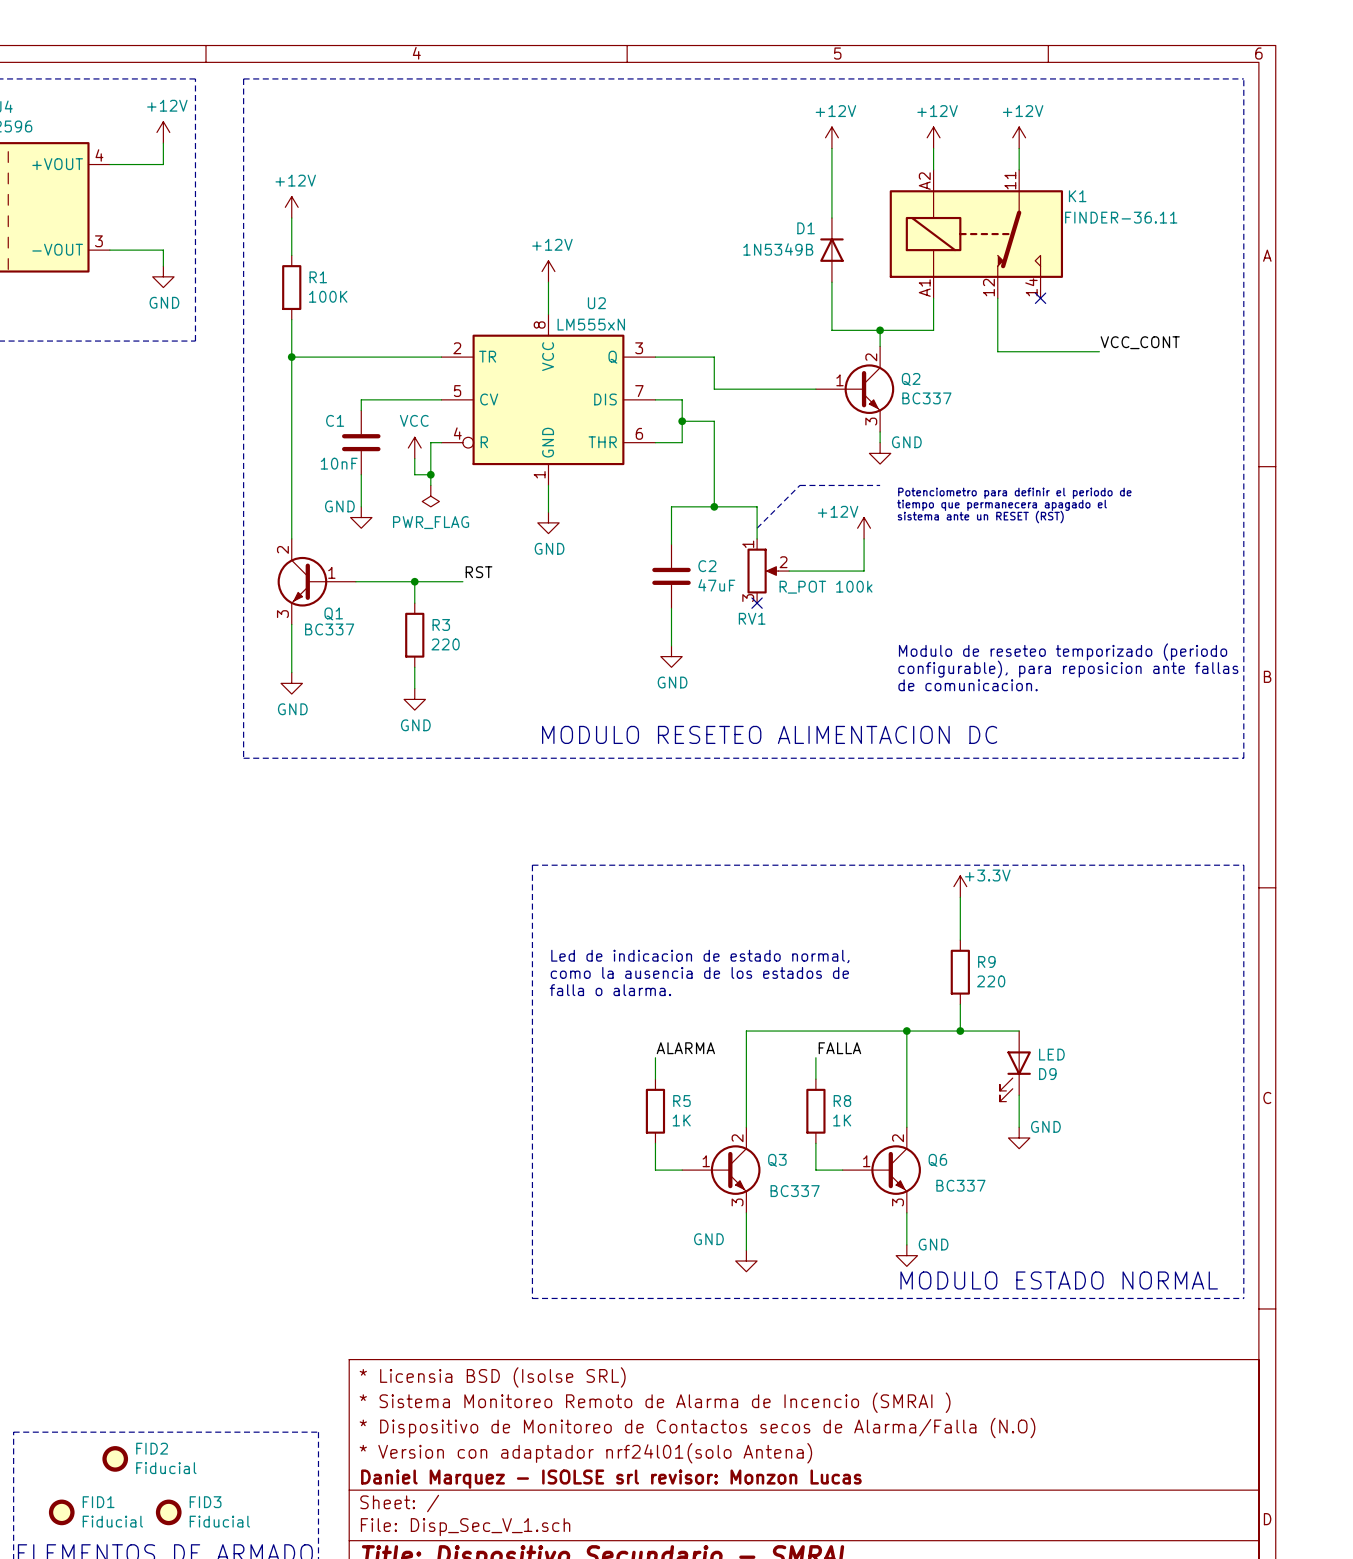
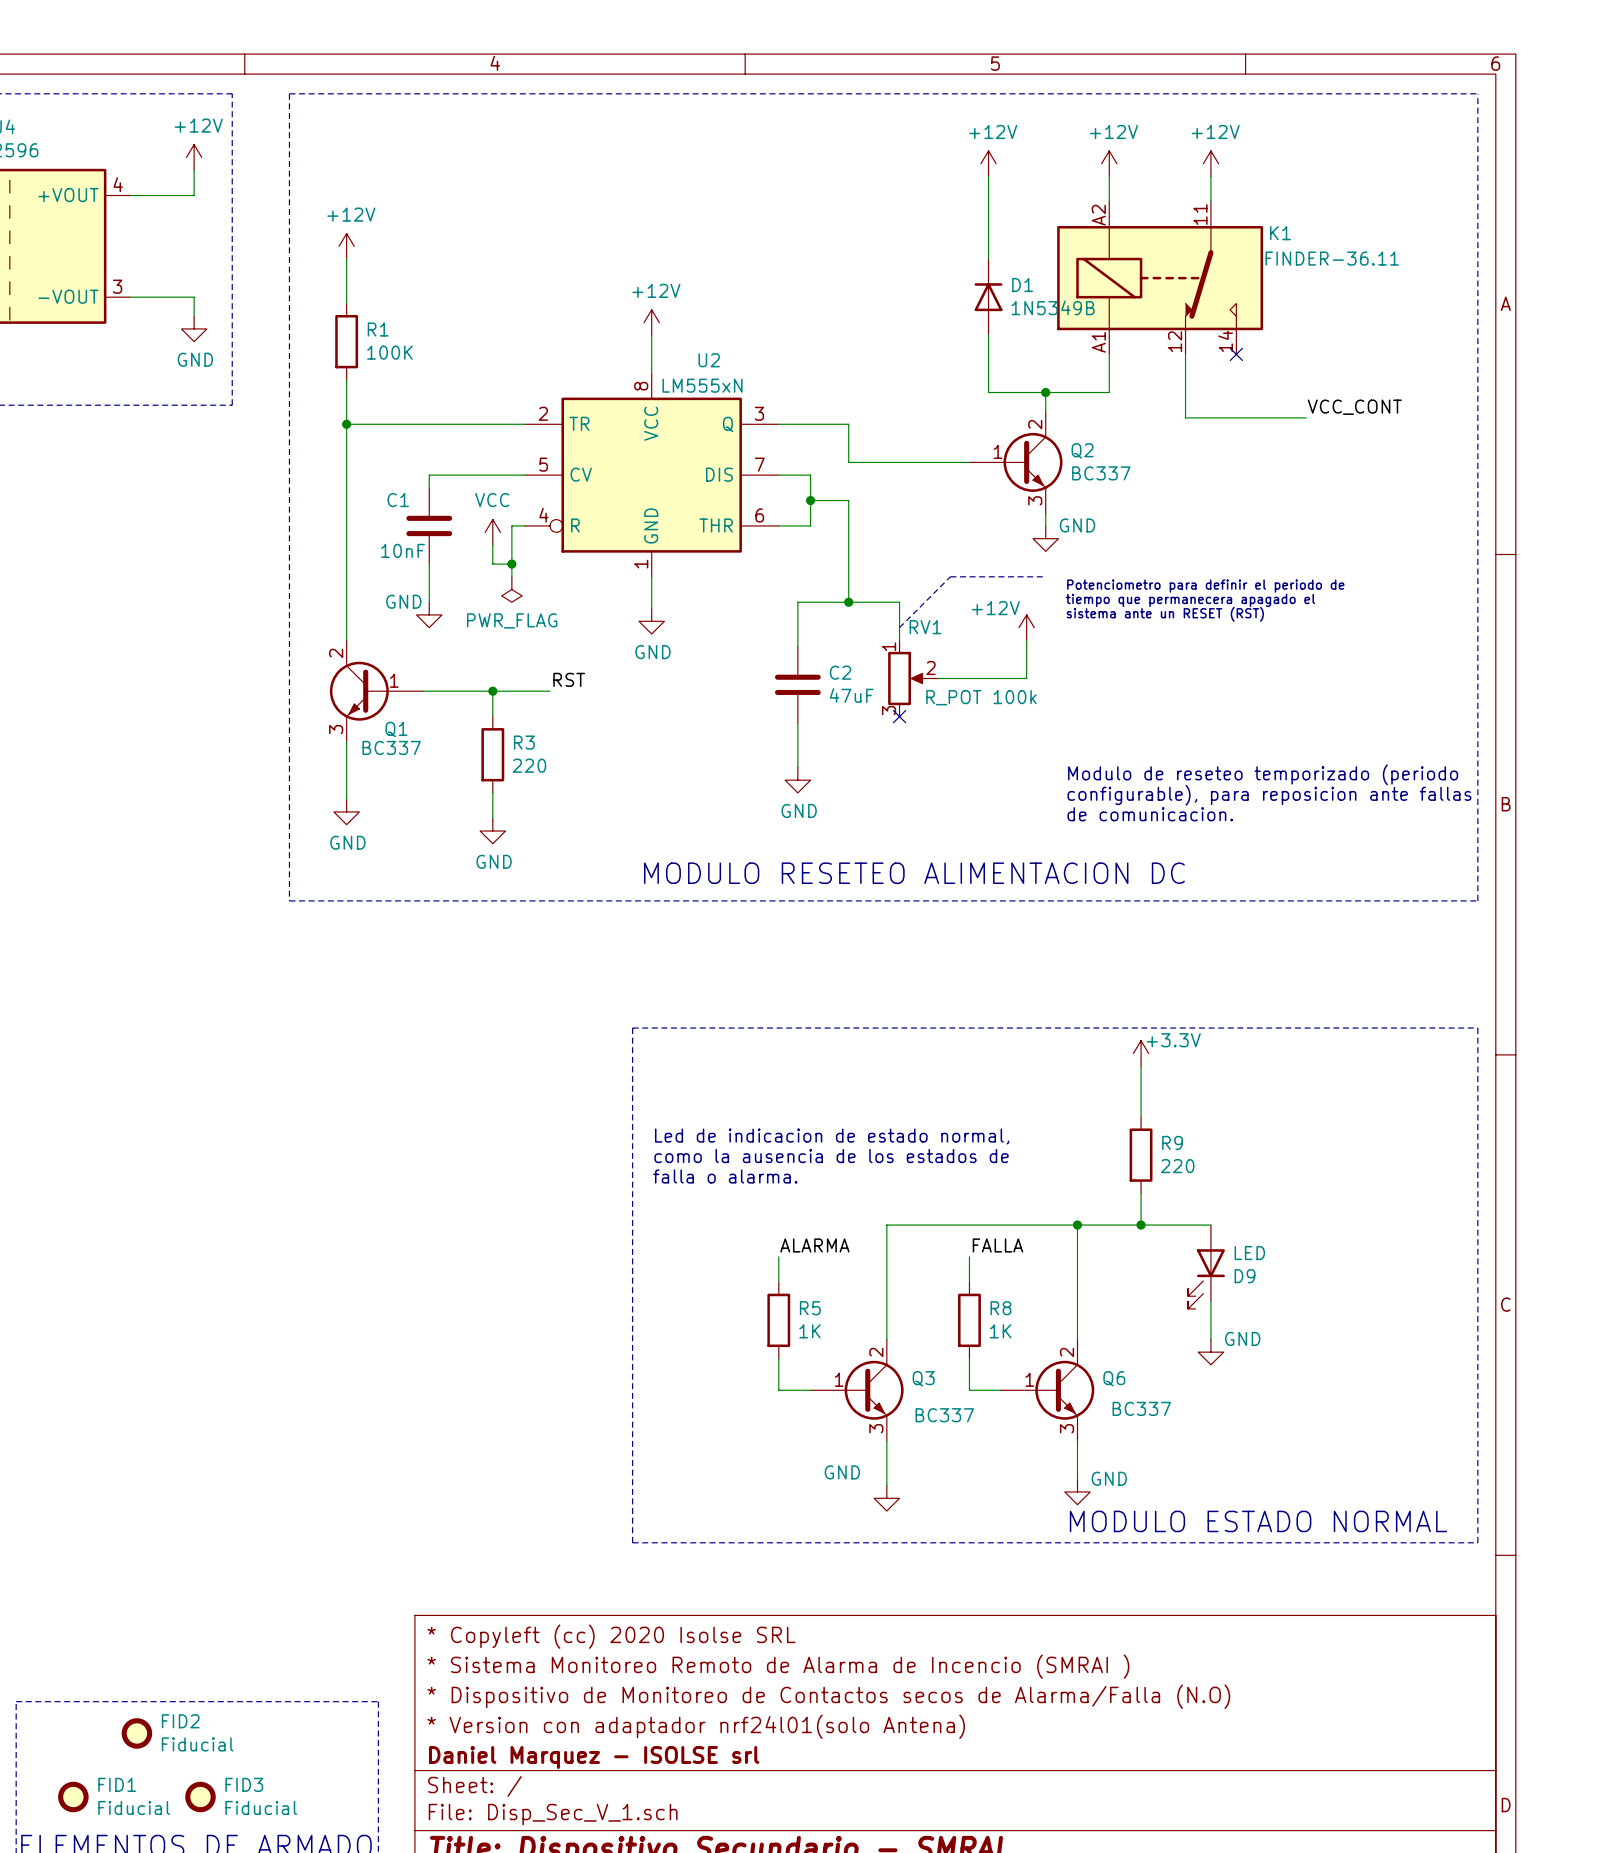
D1 name position: D1 (806, 228) -> D1 (1022, 285)
D1 value position: 1N5349B (778, 249) -> 1N5349B (1053, 307)
RV1 name position: RV1 (752, 618) -> RV1 (925, 627)
title block: * Licensia BSD (Isolse SRL) (492, 1377) -> * Copyleft (cc) 2020 Isolse SRL (611, 1636)
title block: Daniel Marquez - ISOLSE srl revisor: Monzon Lucas (611, 1479) -> Daniel Marquez - ISOLSE srl (594, 1757)

